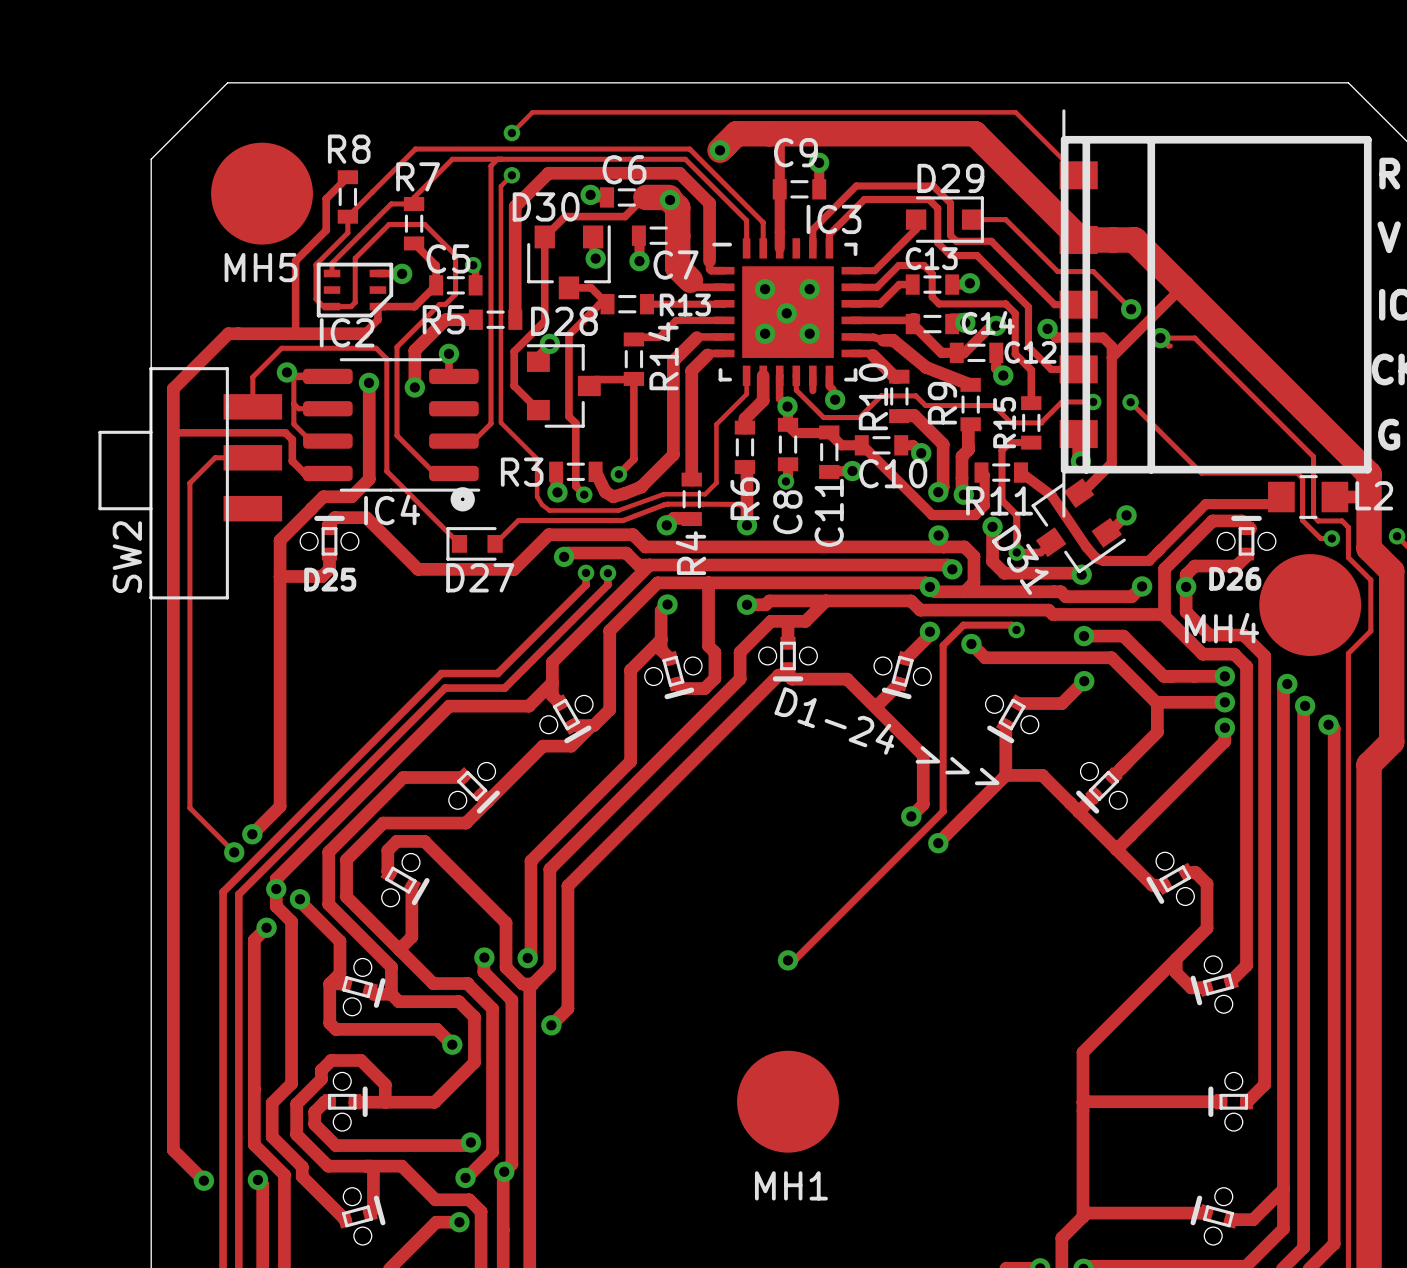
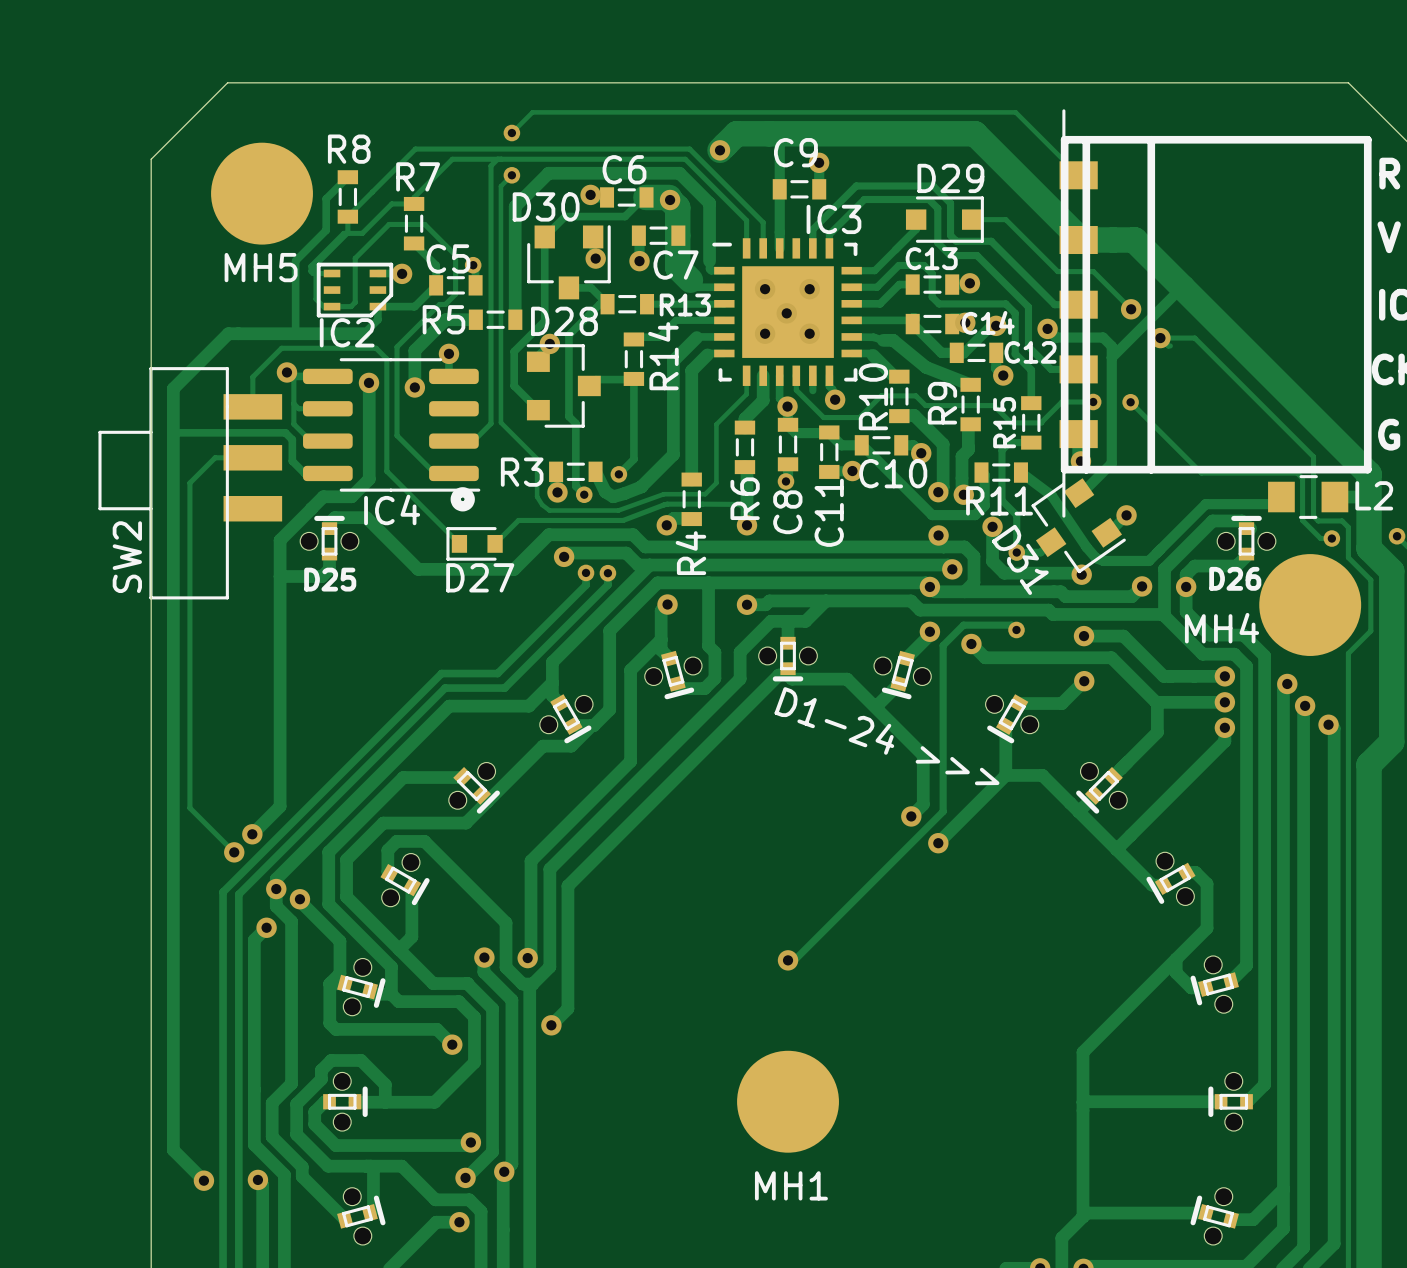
track: (391, 203) (332, 263) (332, 273) -> (391, 203) (362, 233) (343, 233) (310, 266) (313, 273) (332, 273)

